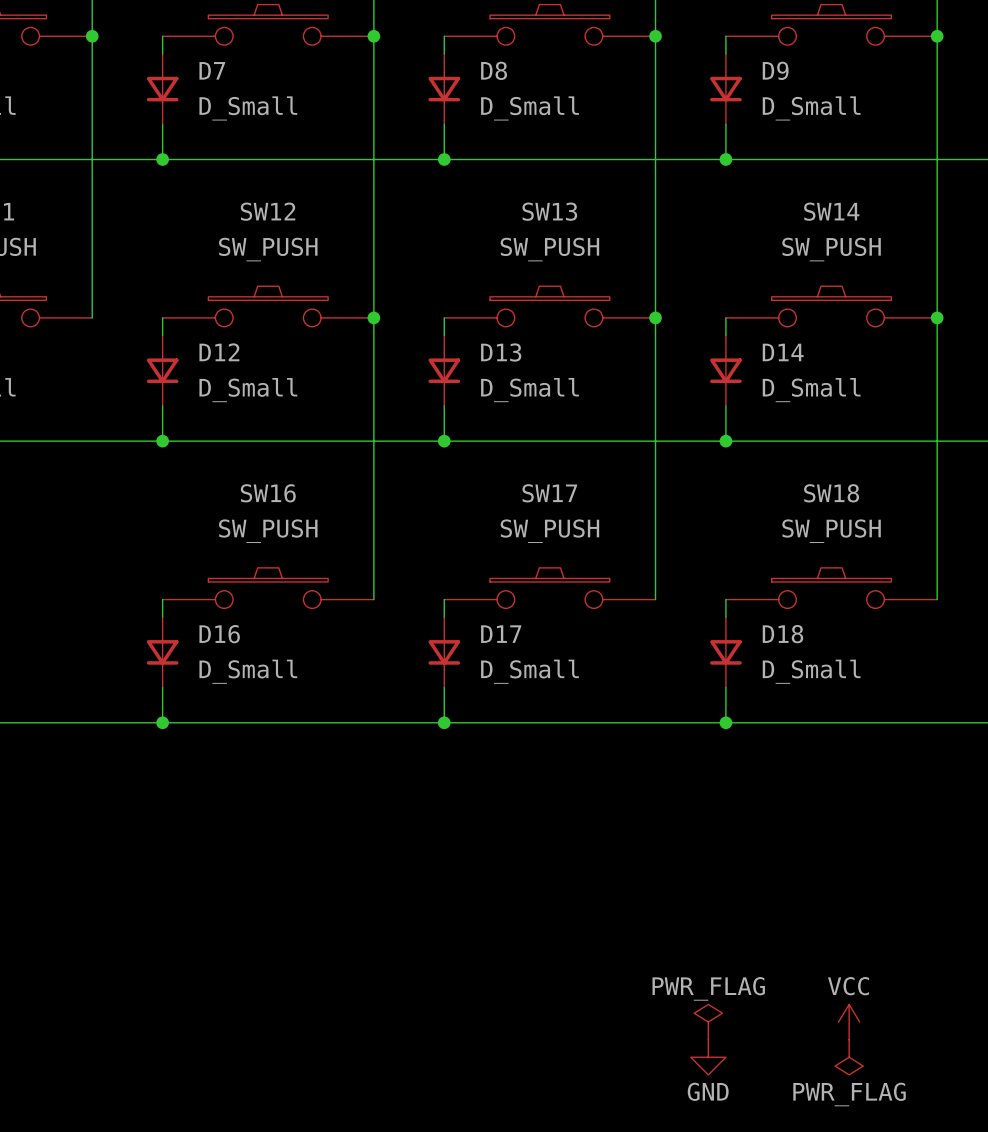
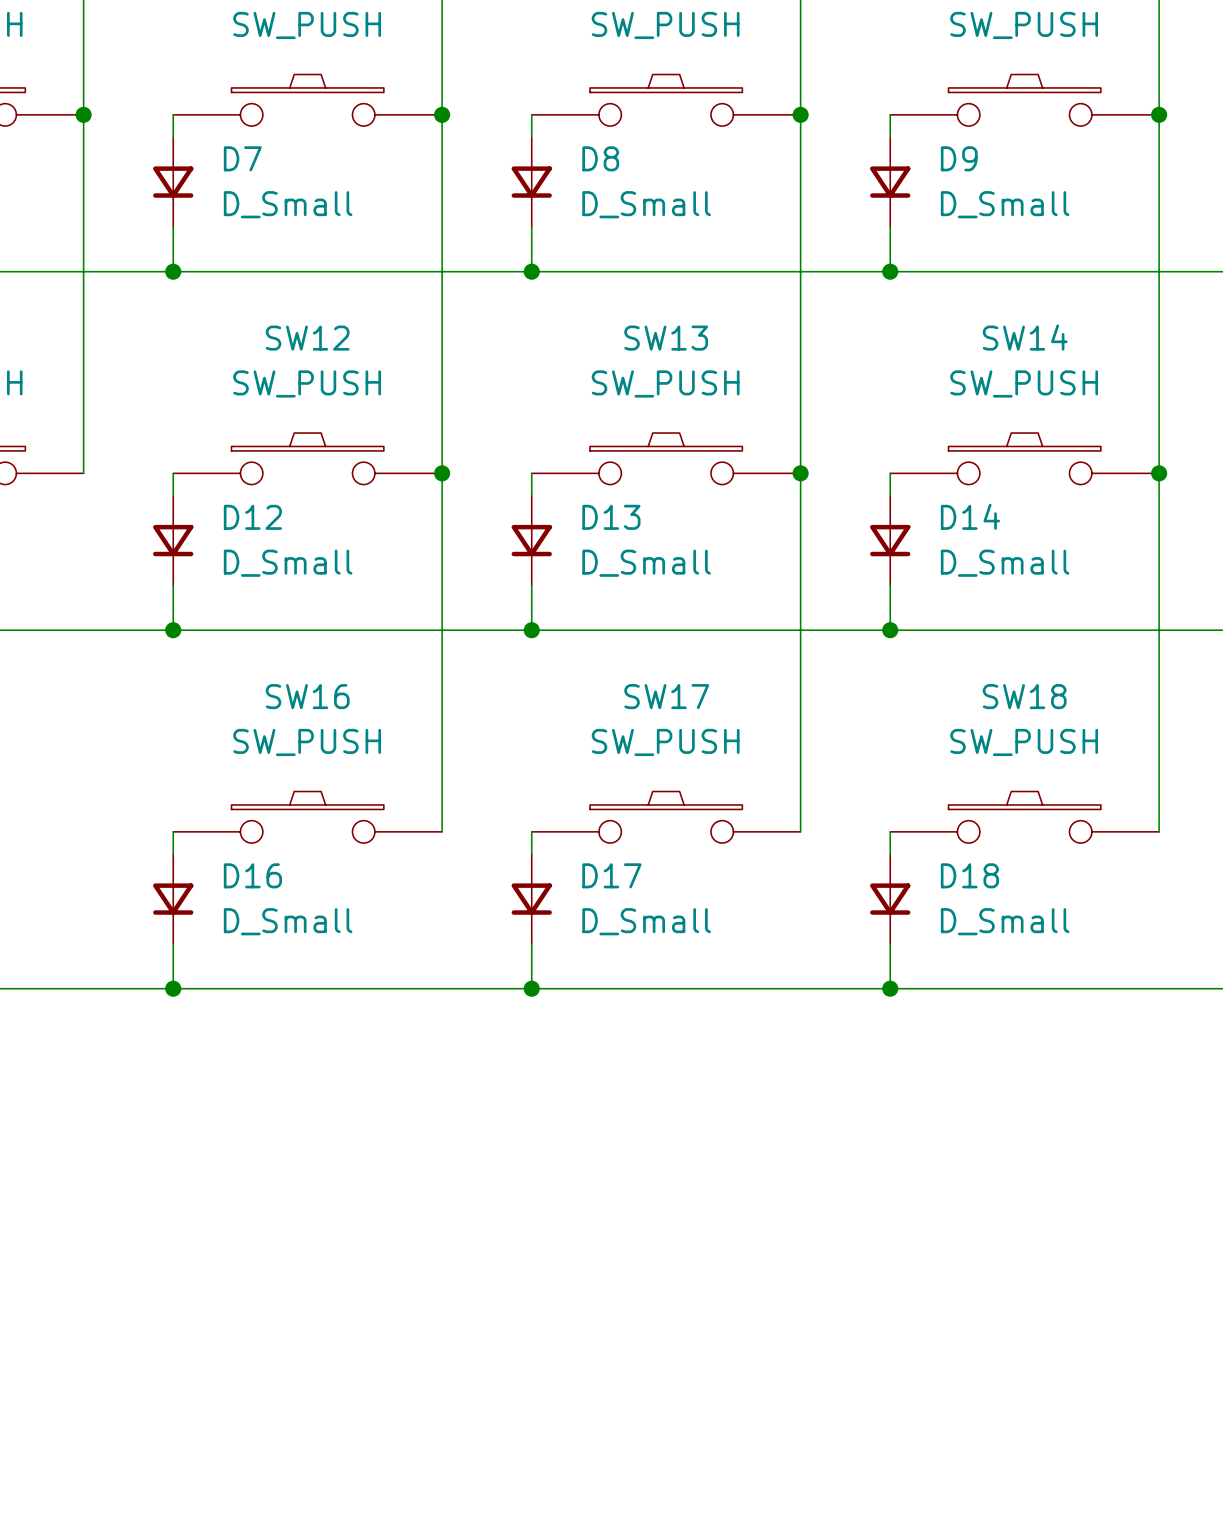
power symbol: PWR_FLAG (708, 1022) -> none
power symbol: VCC (849, 1022) -> none
power symbol: GND (708, 1057) -> none
power symbol: PWR_FLAG (849, 1057) -> none

